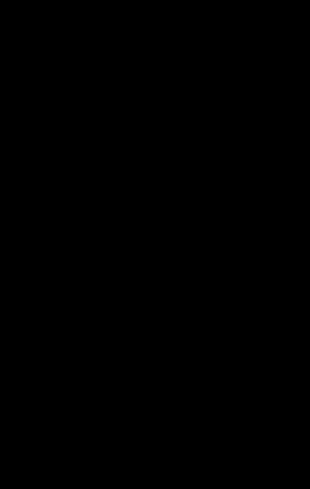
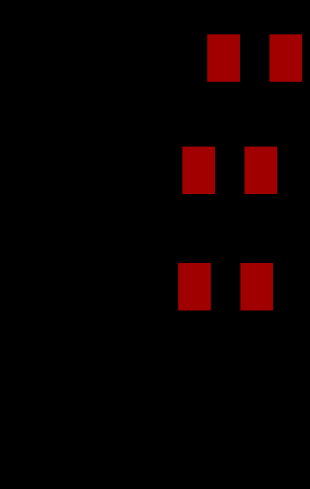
part: none -> (254, 58)
part: none -> (229, 170)
part: none -> (225, 286)

